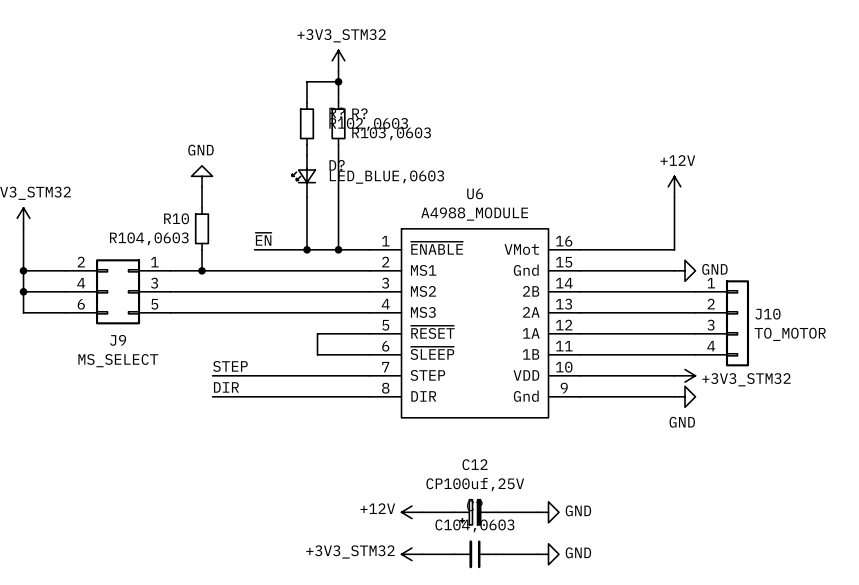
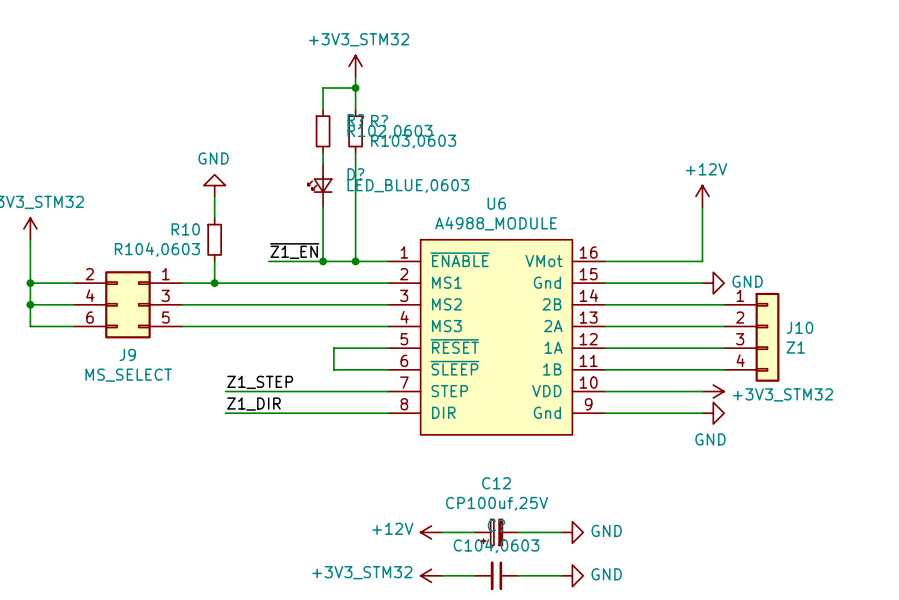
label: ~{EN} (263, 239) -> ~{Z1_EN} (294, 251)
J10 value: TO_MOTOR (790, 334) -> Z1 (795, 347)
label: STEP (230, 366) -> Z1_STEP (260, 382)
label: DIR (226, 387) -> Z1_DIR (253, 404)

